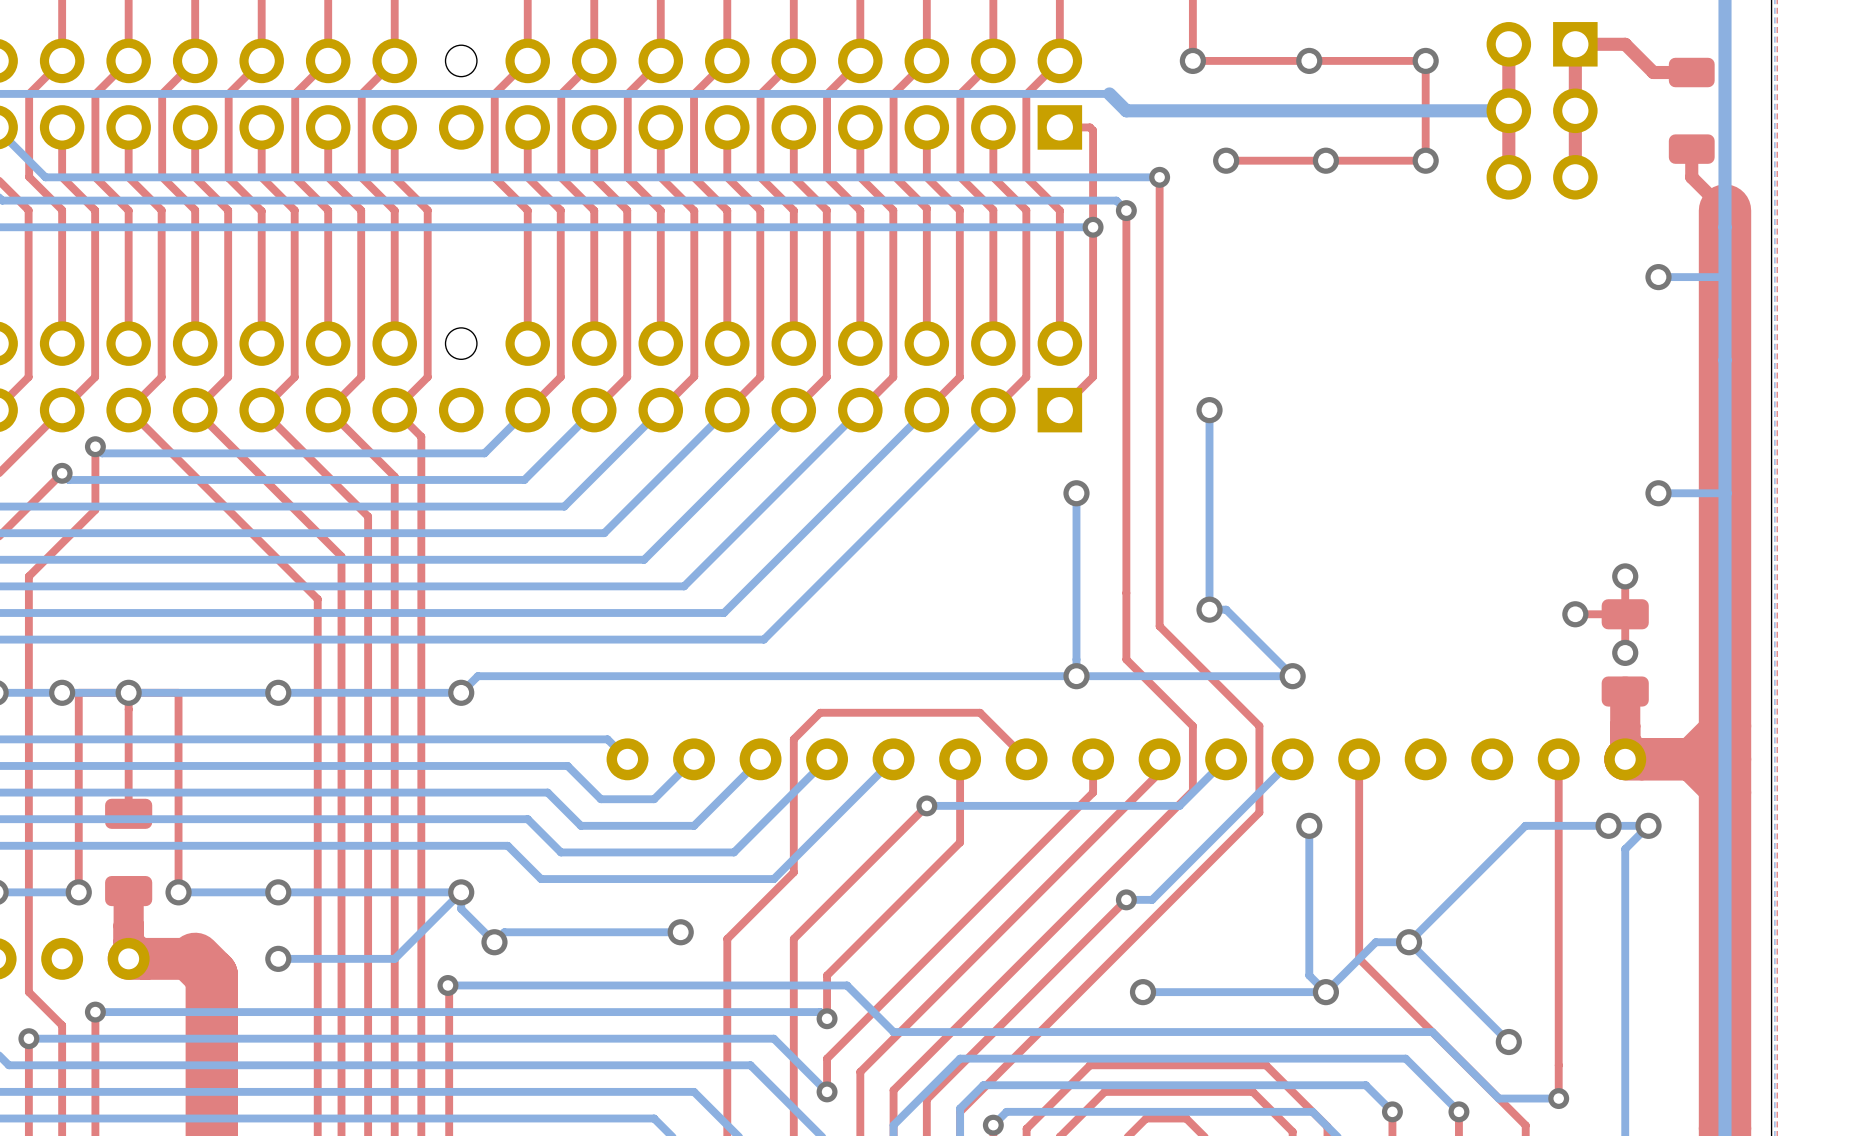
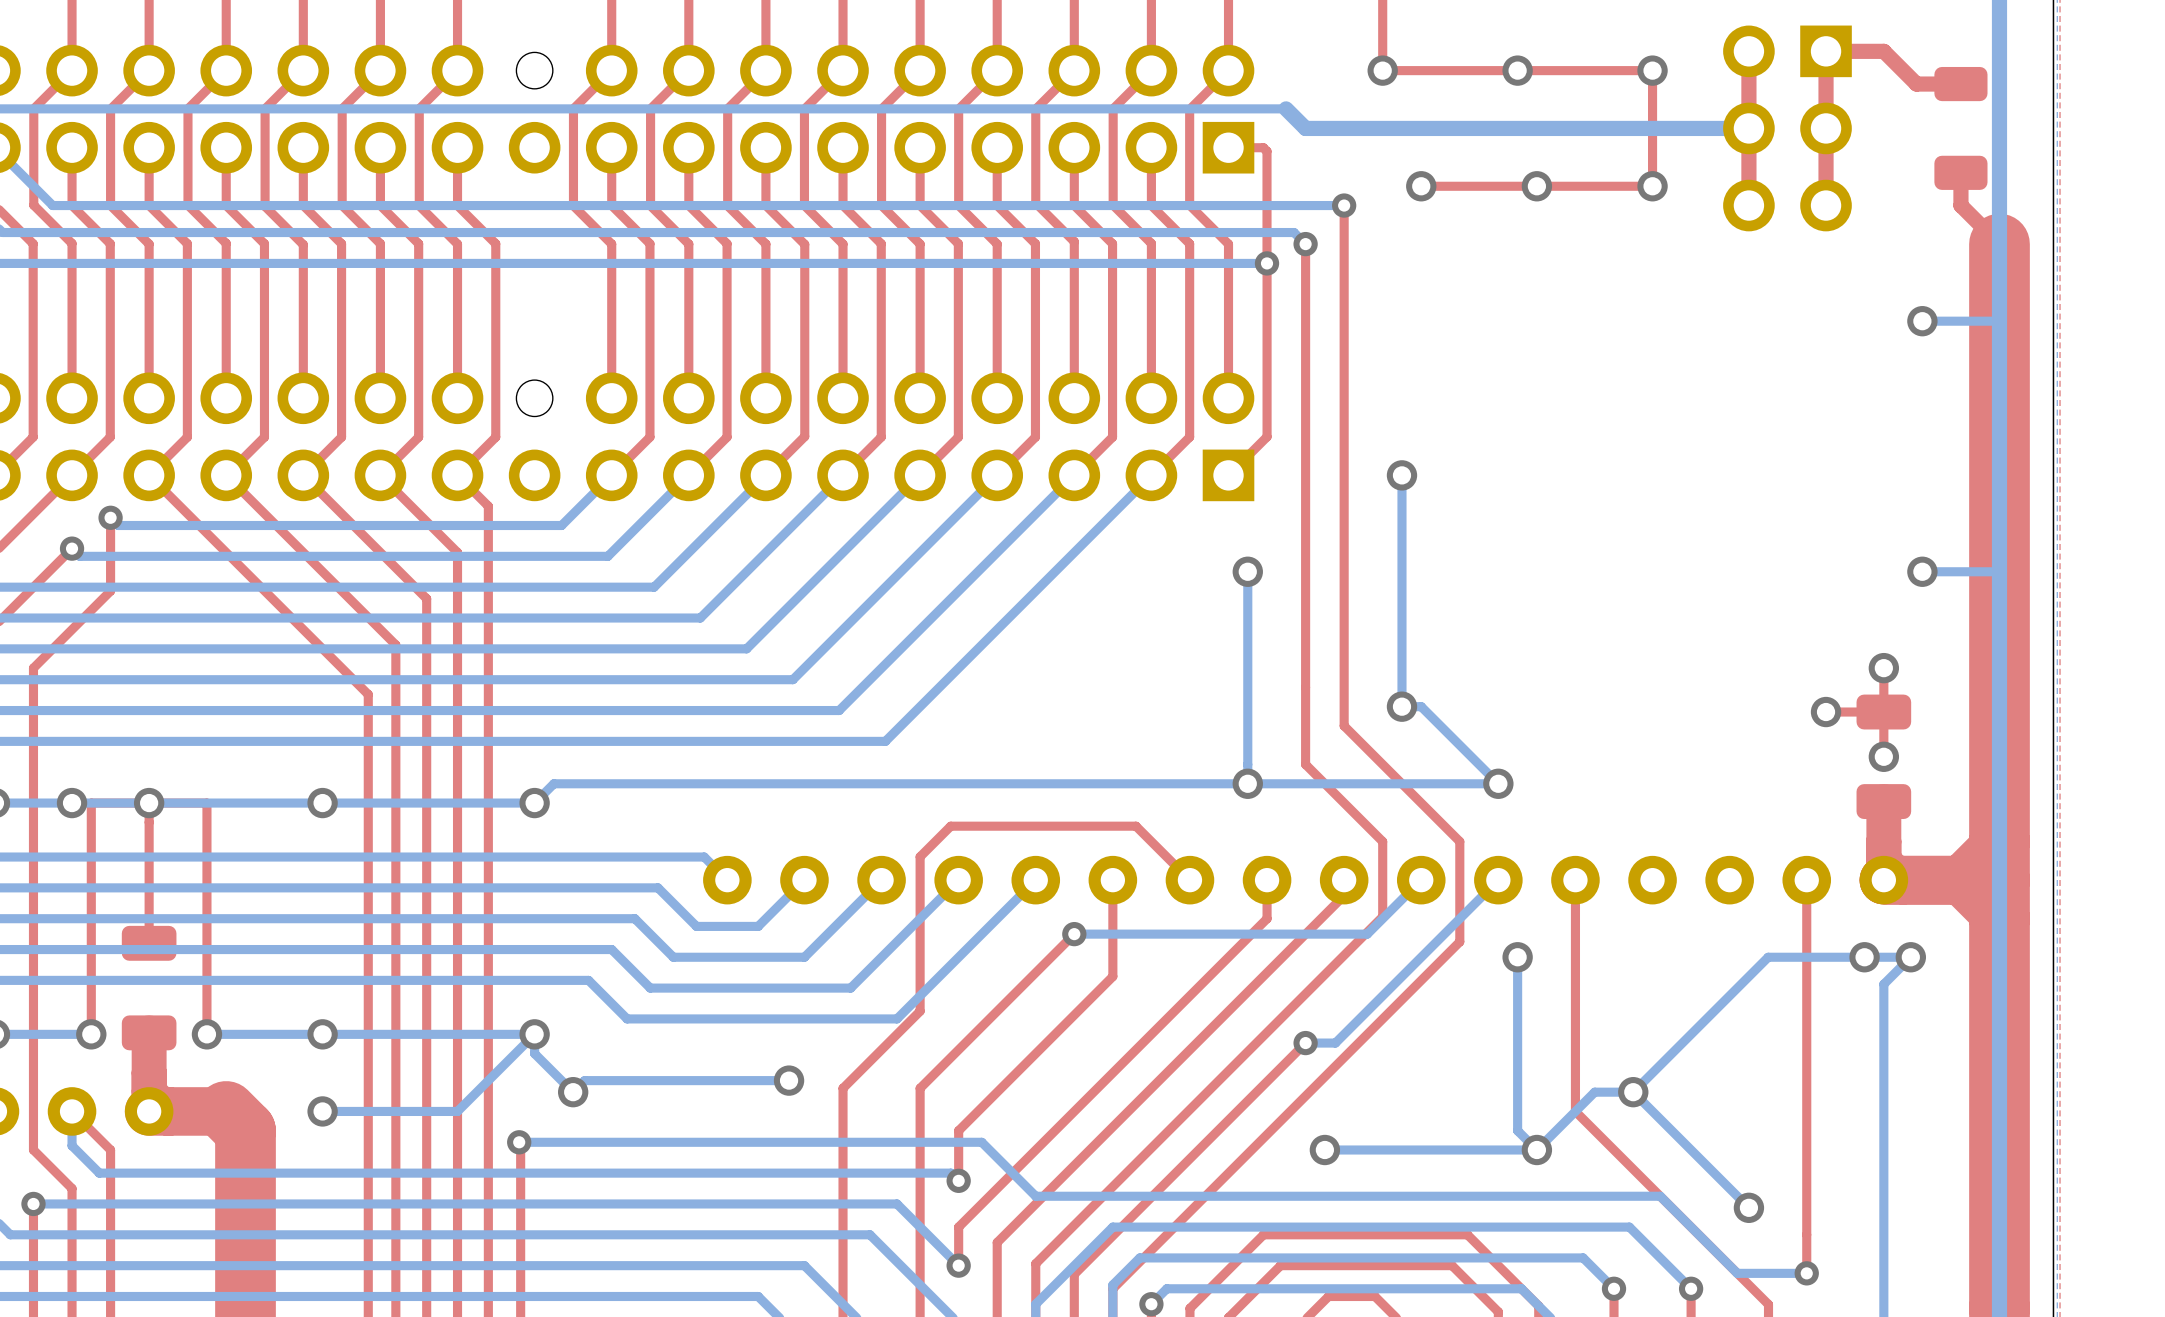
bottom track: none -> (72, 1111) (72, 1145) (99, 1173) (110, 1173)
top track: none -> (72, 1111) (110, 1150) (110, 1173)
via: (95, 1012) -> none

